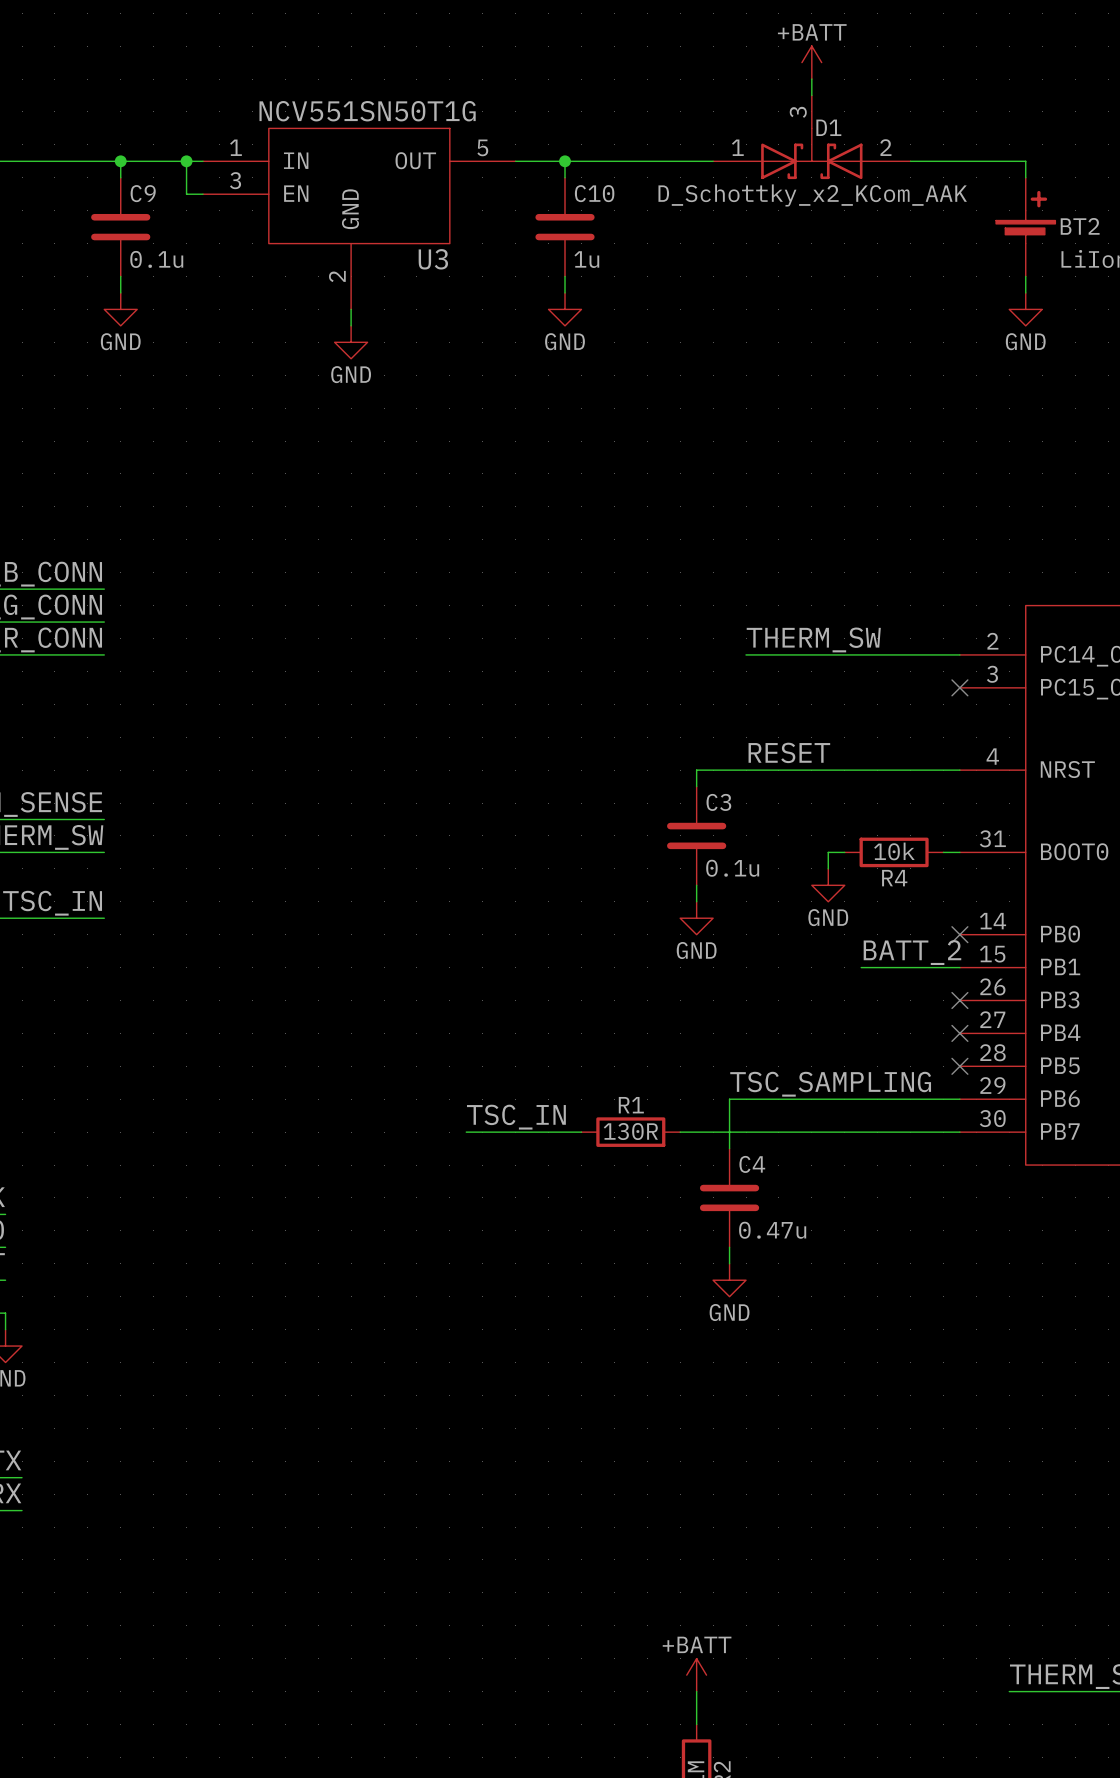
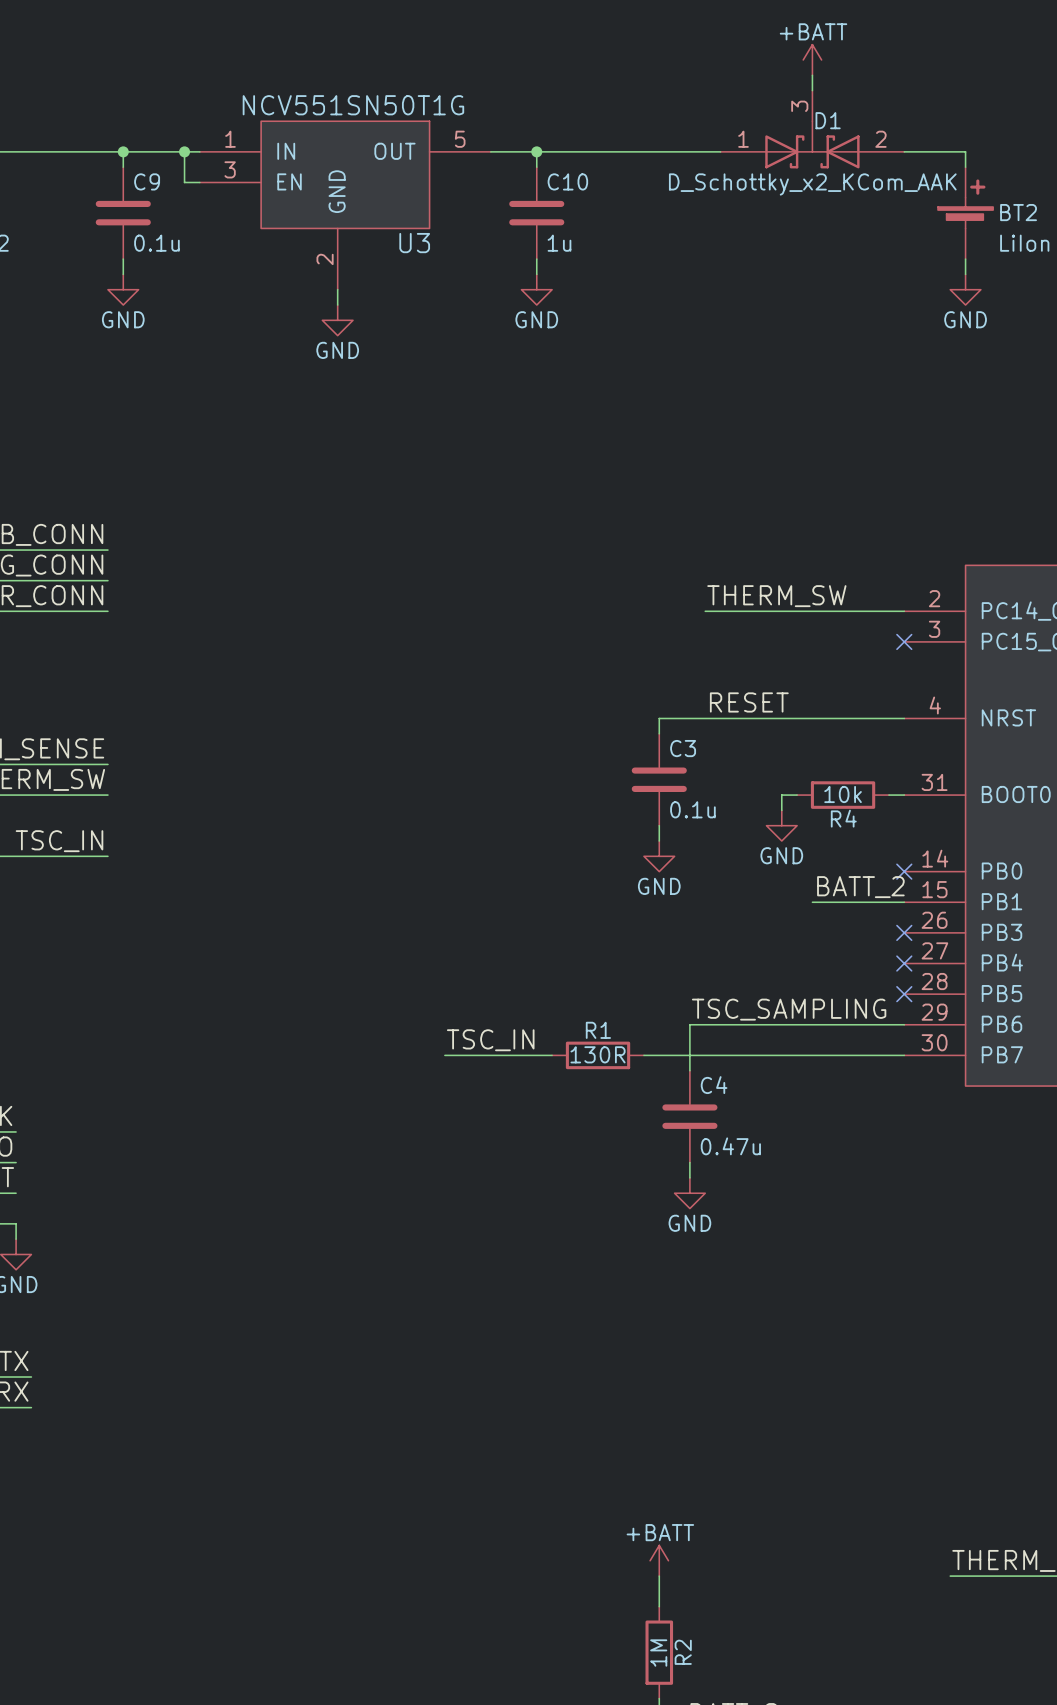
power symbol position: +BATT (811, 62) -> +BATT (812, 59)
wire: (811, 79) (811, 95) -> (812, 75) (812, 90)
D1 position: (811, 137) -> (812, 129)

